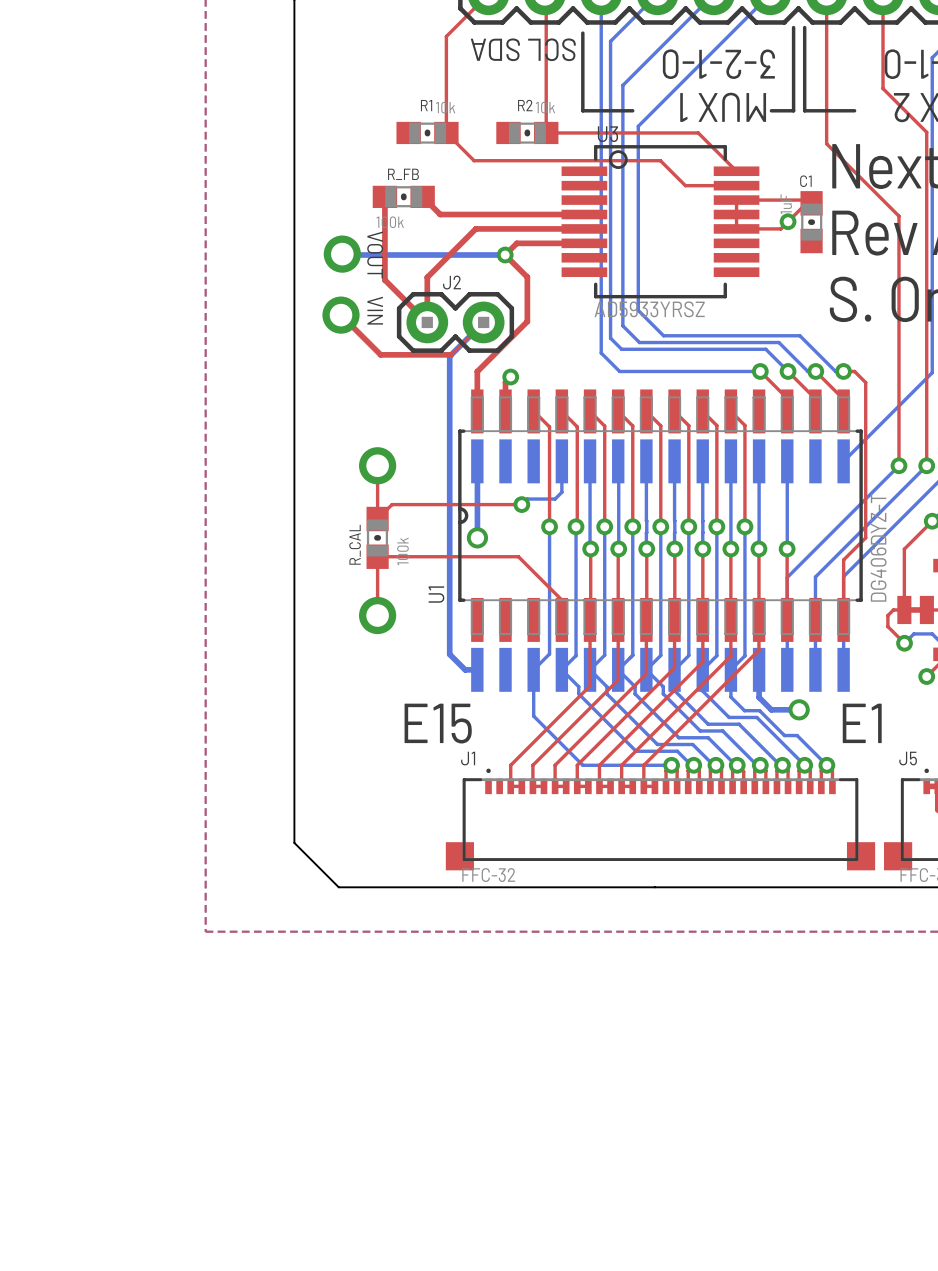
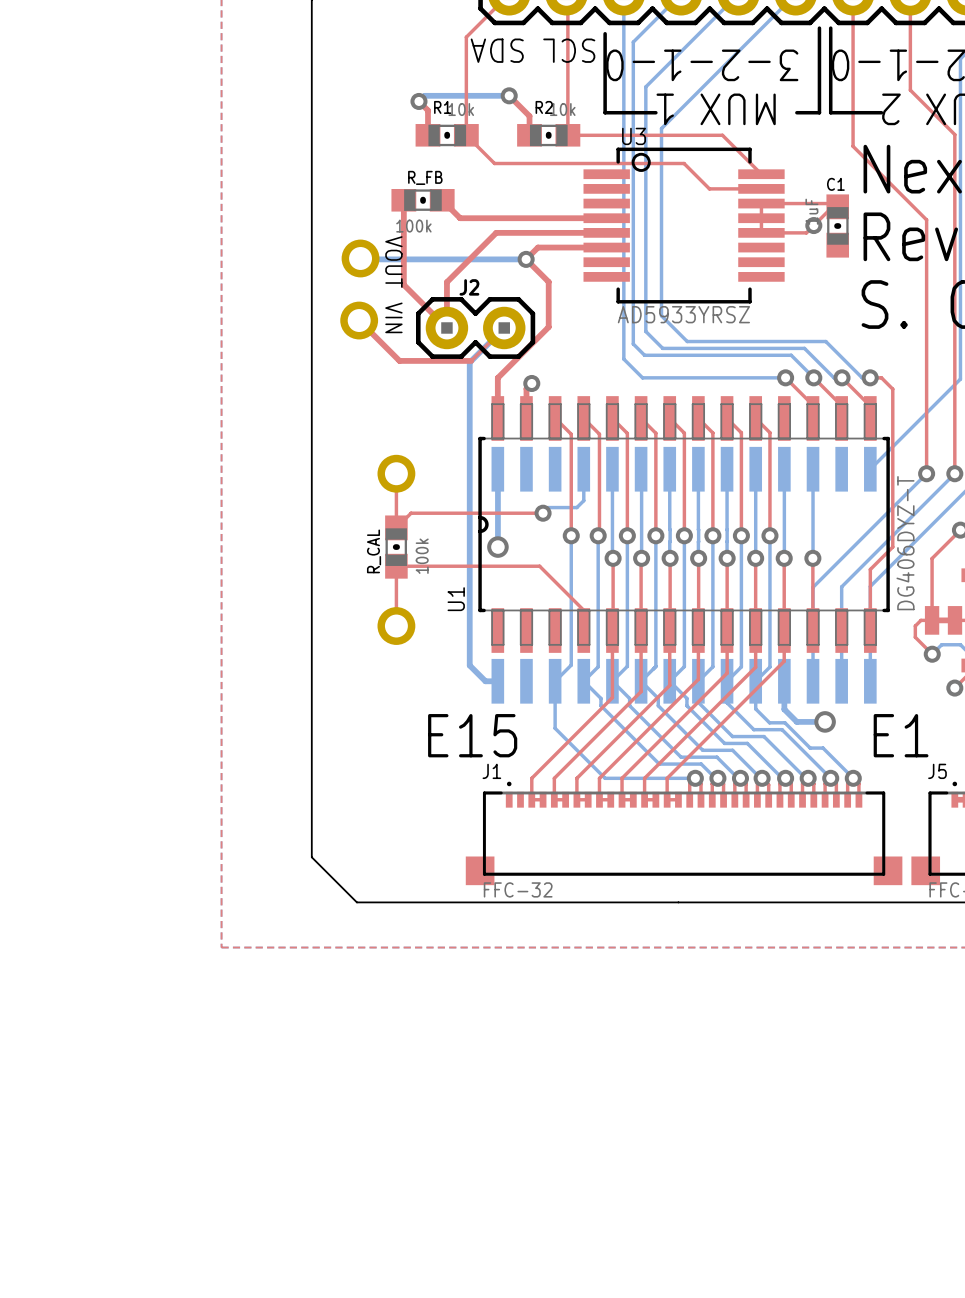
top track: none -> (509, 95) (529, 116) (529, 135)
bottom track: none -> (509, 95) (424, 95) (418, 101)
via: none -> (509, 95)
top track: none -> (418, 101) (427, 110) (427, 135)
via: none -> (418, 101)

